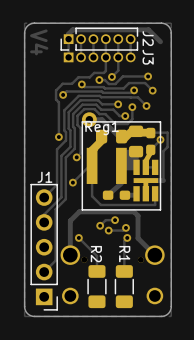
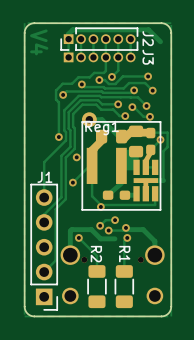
track: none -> (133, 106) (143, 116) (149, 116)
track: (132, 107) (132, 119) (127, 124) (115, 124) (105, 114) (99, 114) (94, 109) (84, 109) (77, 115) (77, 125) (80, 128) (80, 153) (76, 157) -> none
via: none -> (149, 116)
track: (57, 149) (57, 184) (44, 197) -> (57, 149) (44, 162) (44, 197)
via: none -> (100, 206)
track: none -> (124, 229) (143, 229) (154, 241) (154, 255)
track: (70, 231) (70, 220) (79, 211) (134, 211) (138, 215) (138, 238) (154, 255) -> (70, 231) (91, 229) (100, 238) (114, 238)

